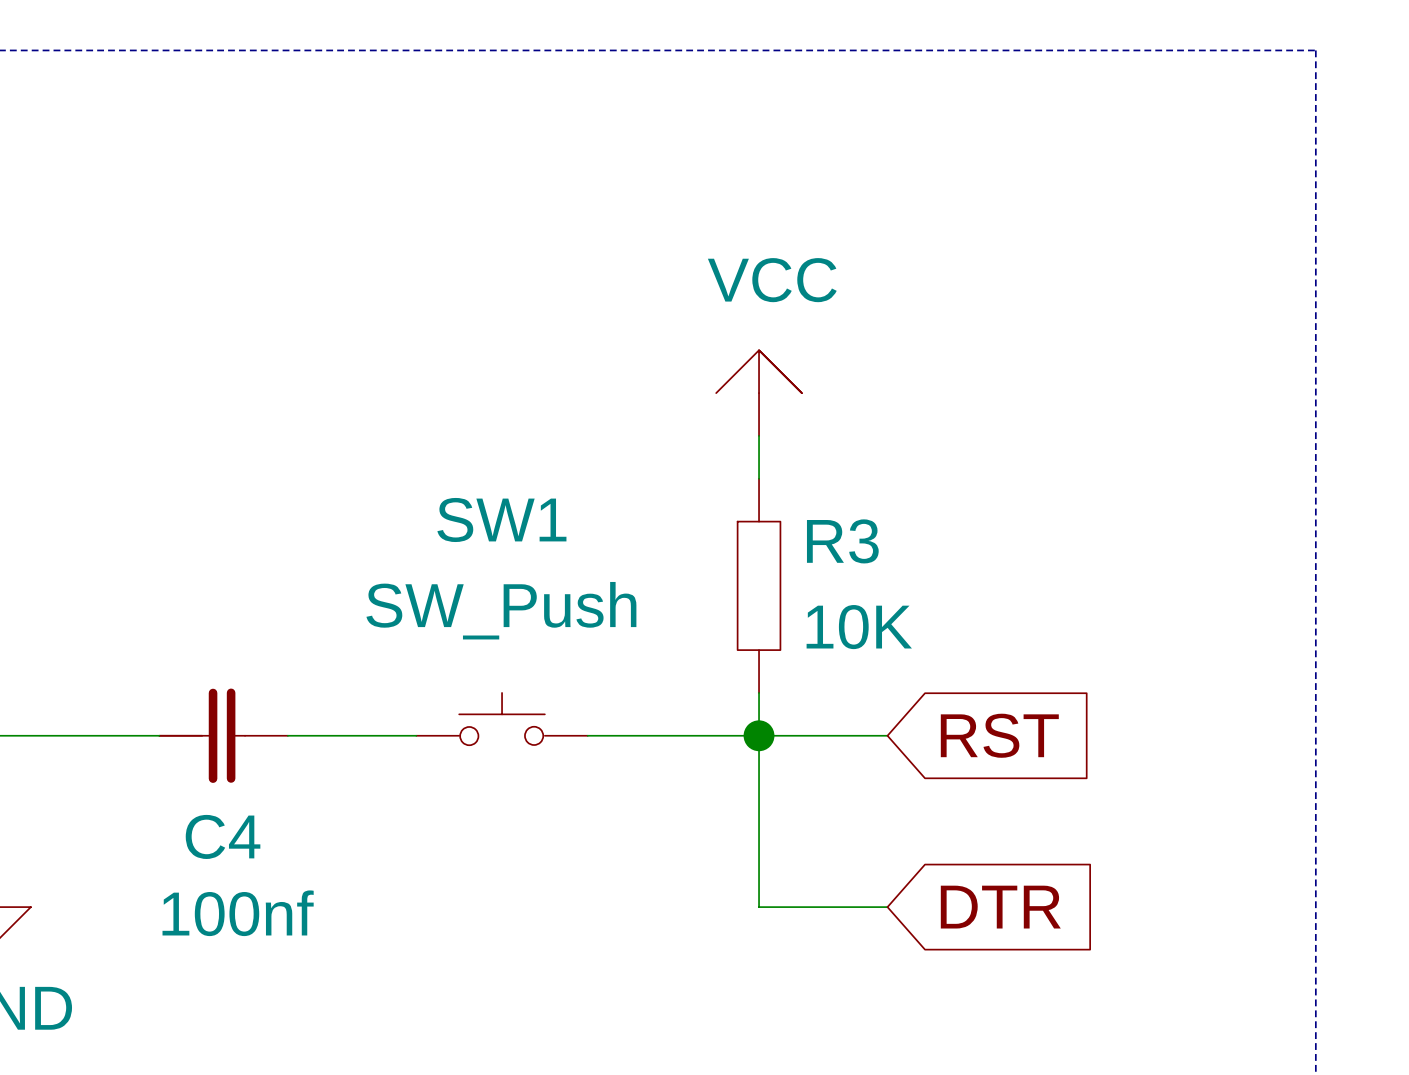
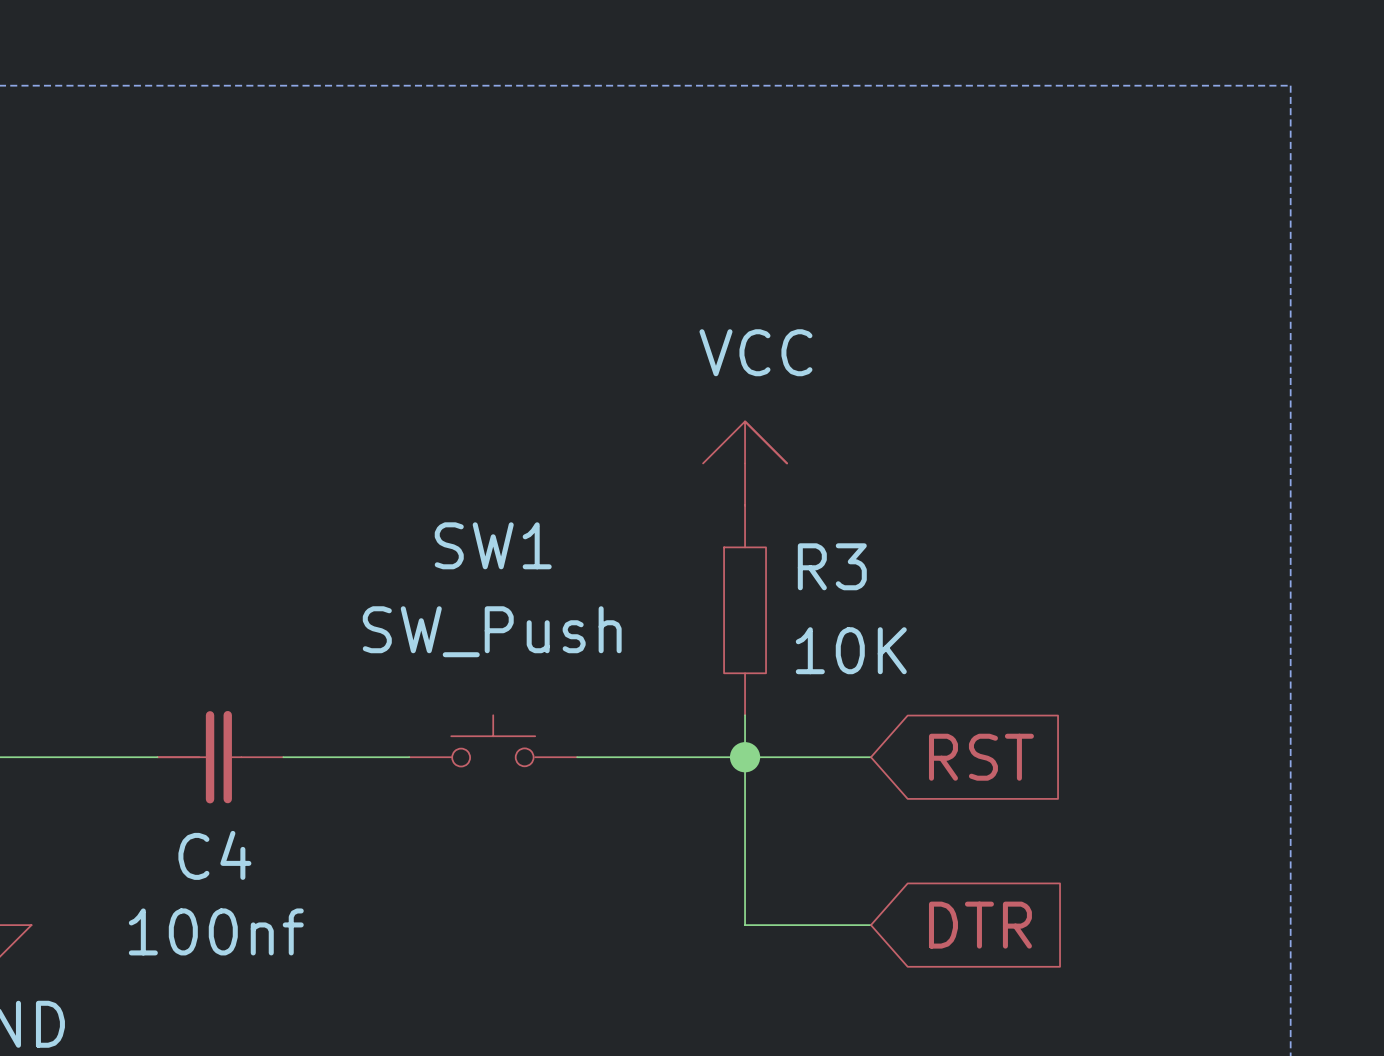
power symbol position: VCC (759, 393) -> VCC (745, 463)

